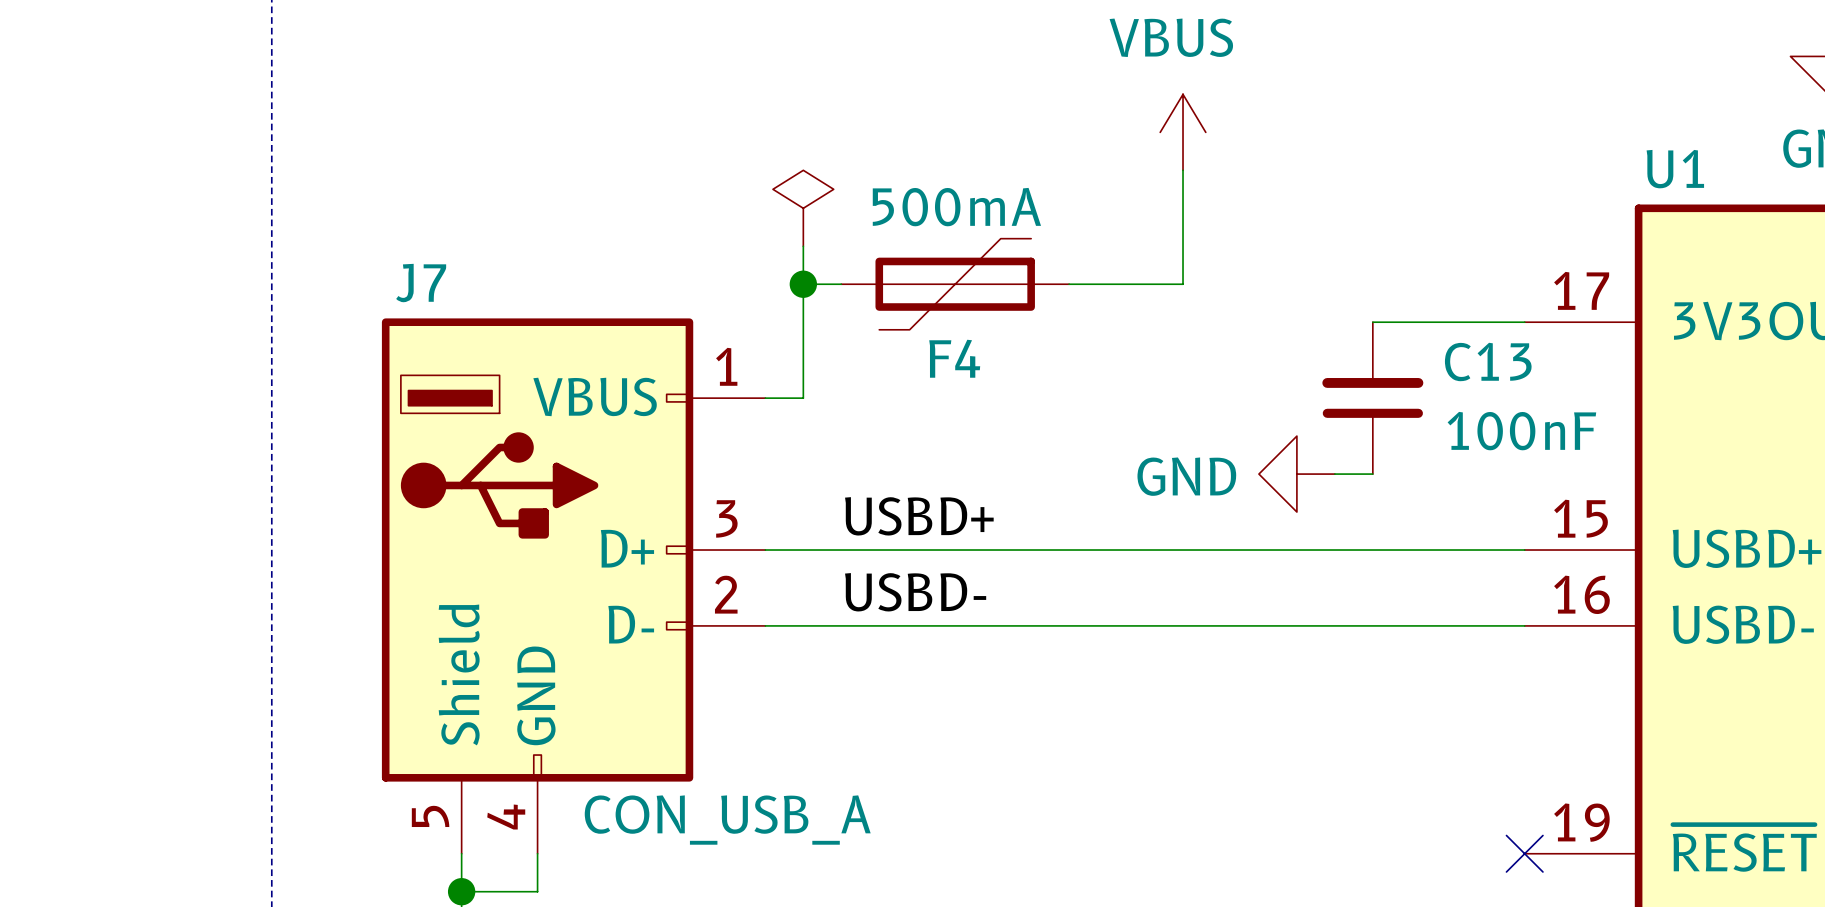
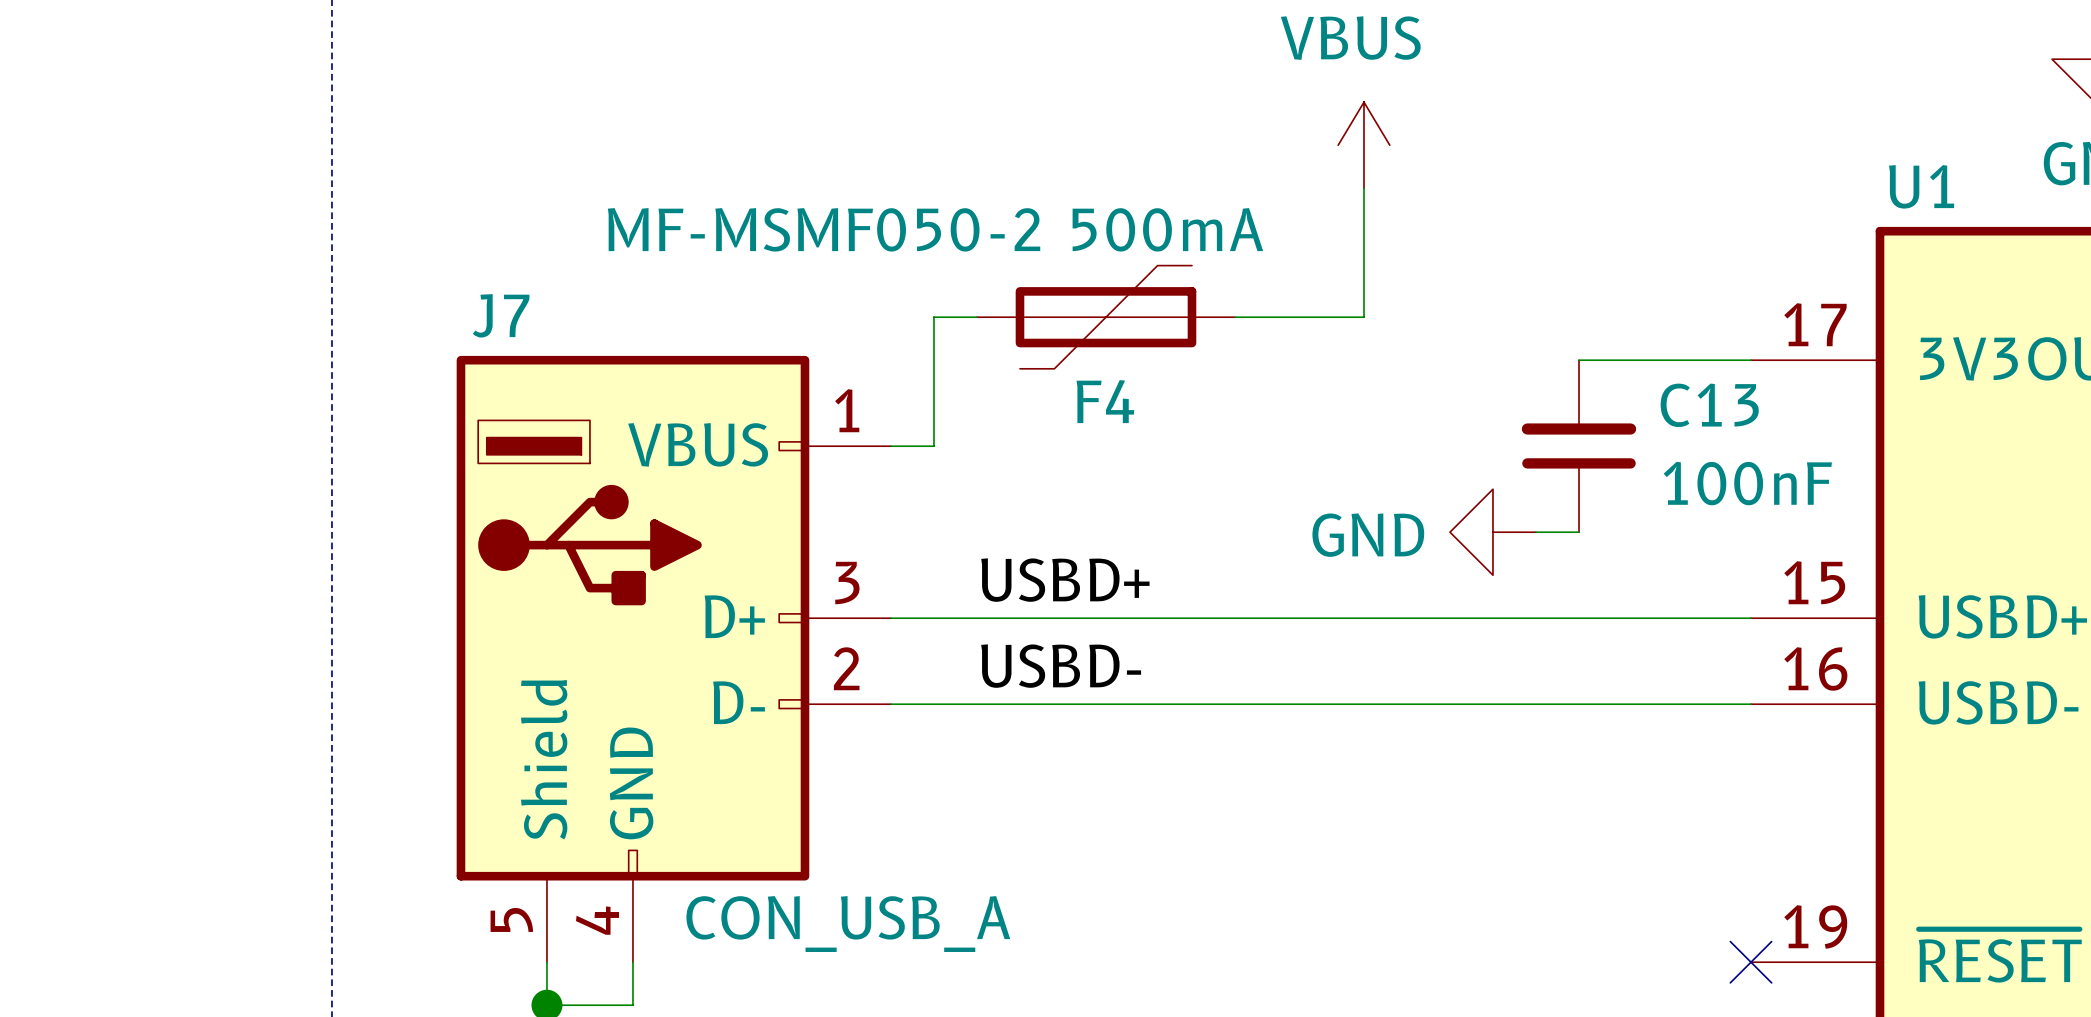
F4 value: 500mA (956, 207) -> MF-MSMF050-2 500mA (935, 229)
power symbol: (803, 208) -> none
wire: (803, 246) (803, 284) -> none
junction: (803, 284) -> none

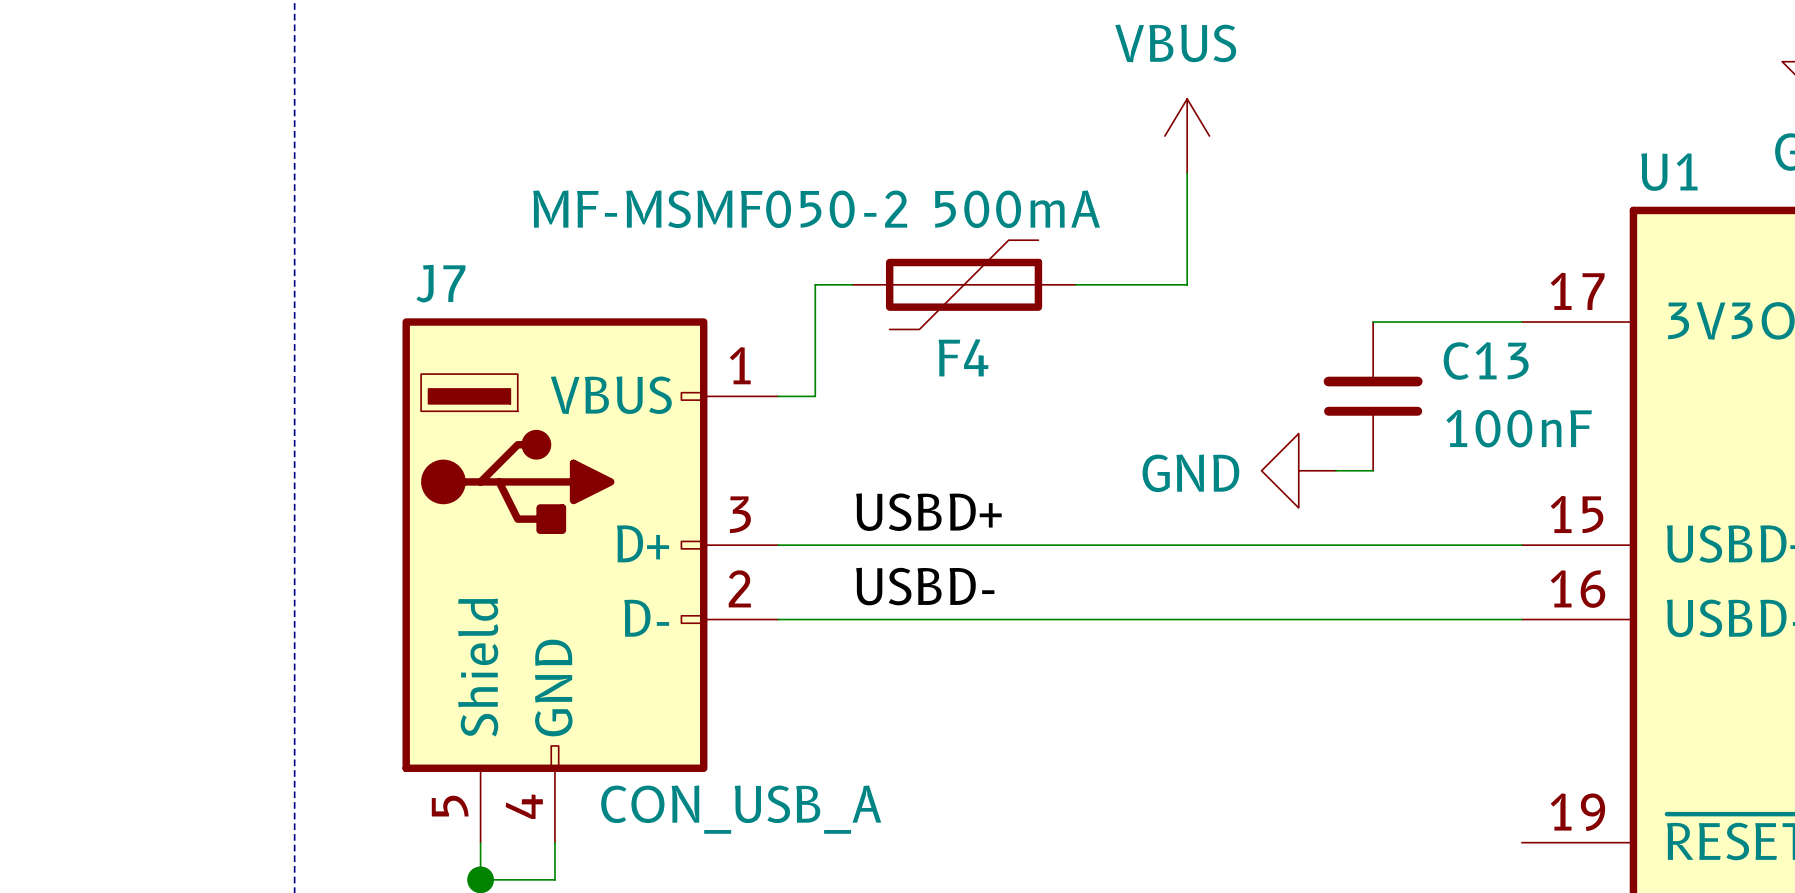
no-connect mark: (1750, 962) -> none

